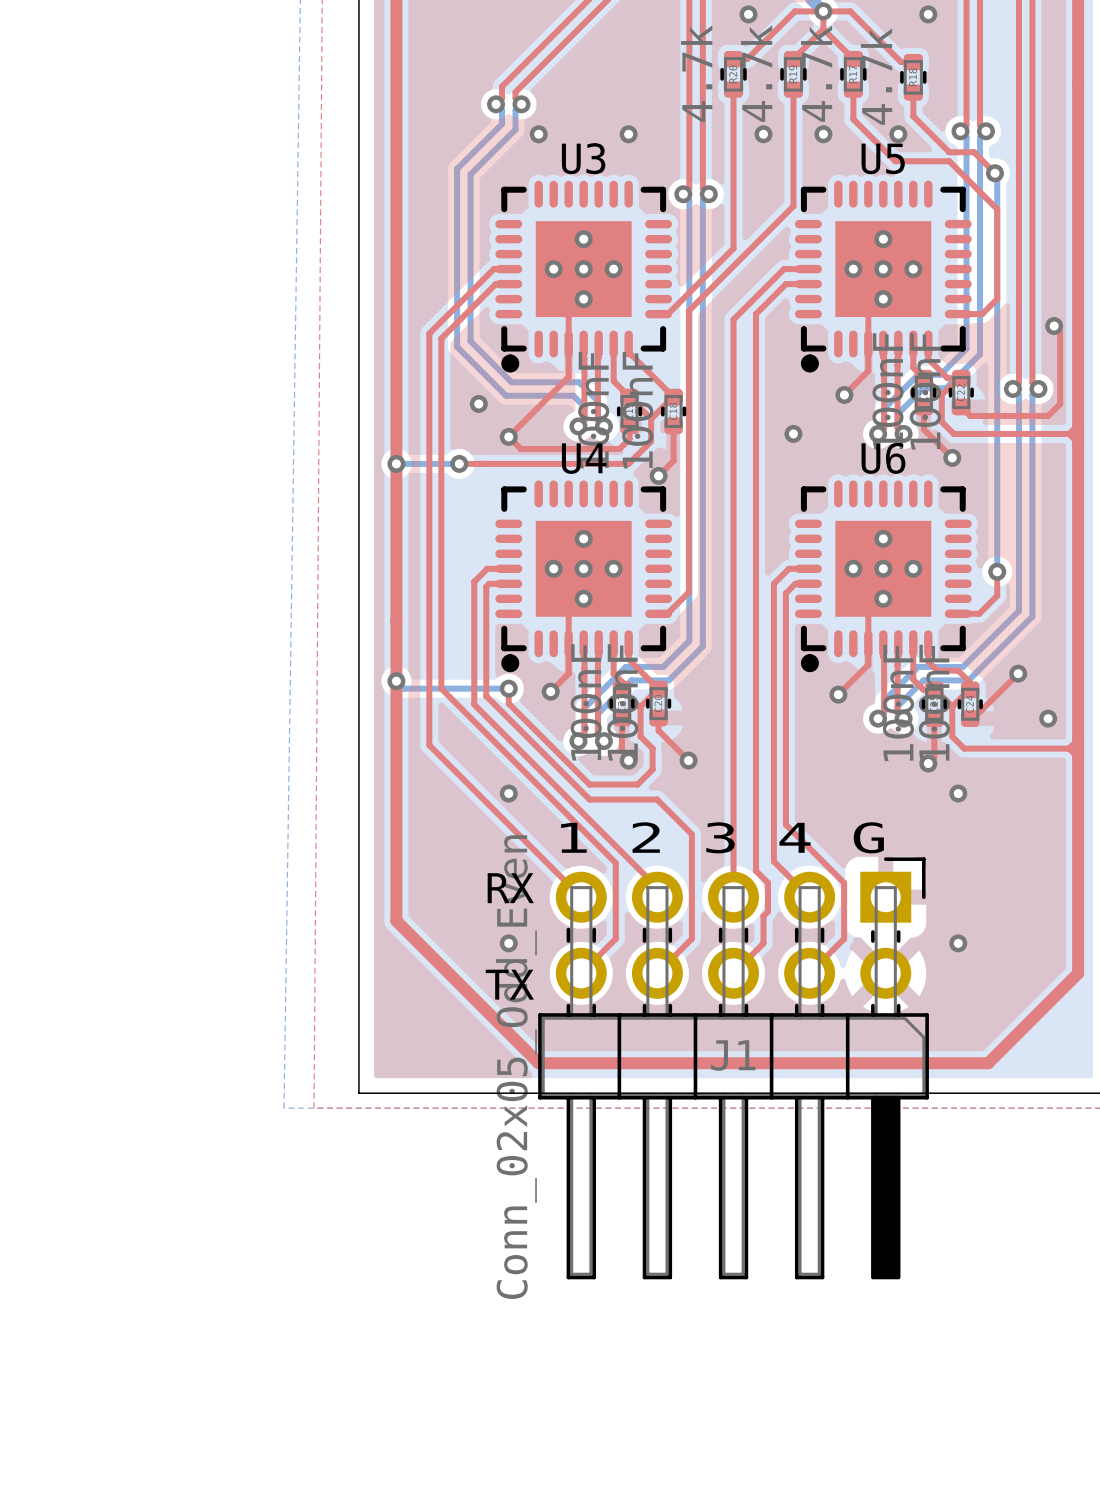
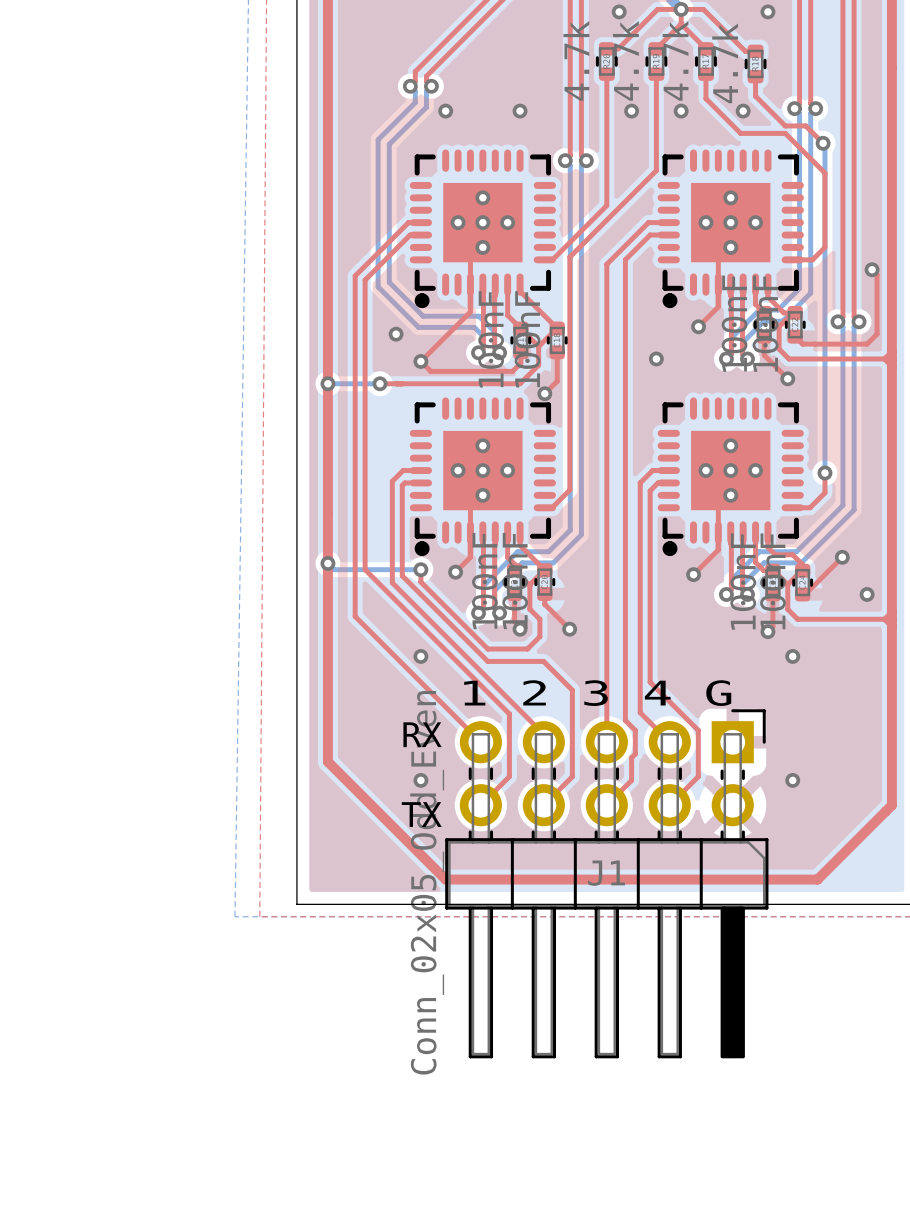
U3 name: U3 (583, 158) -> none
U5 name: U5 (883, 158) -> none
U4 name: U4 (584, 458) -> none
U6 name: U6 (883, 458) -> none

